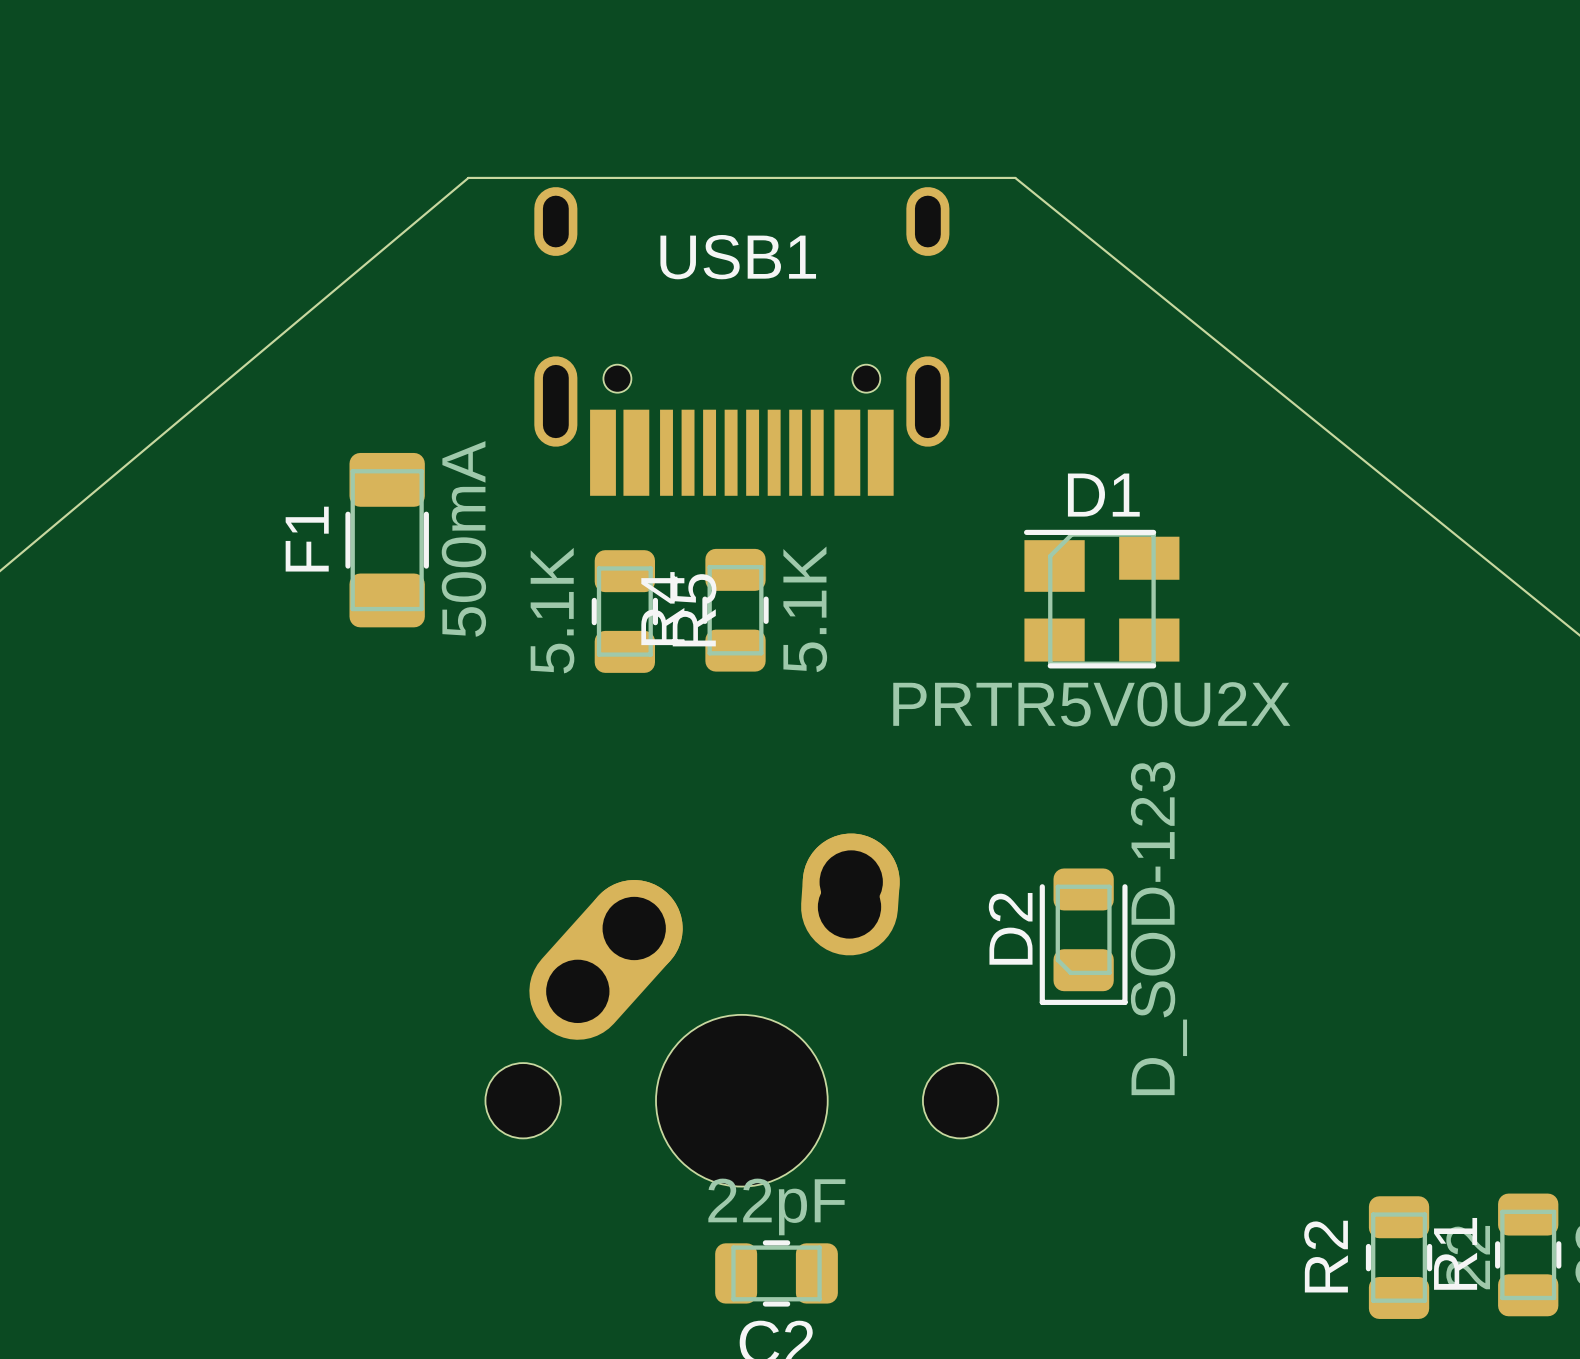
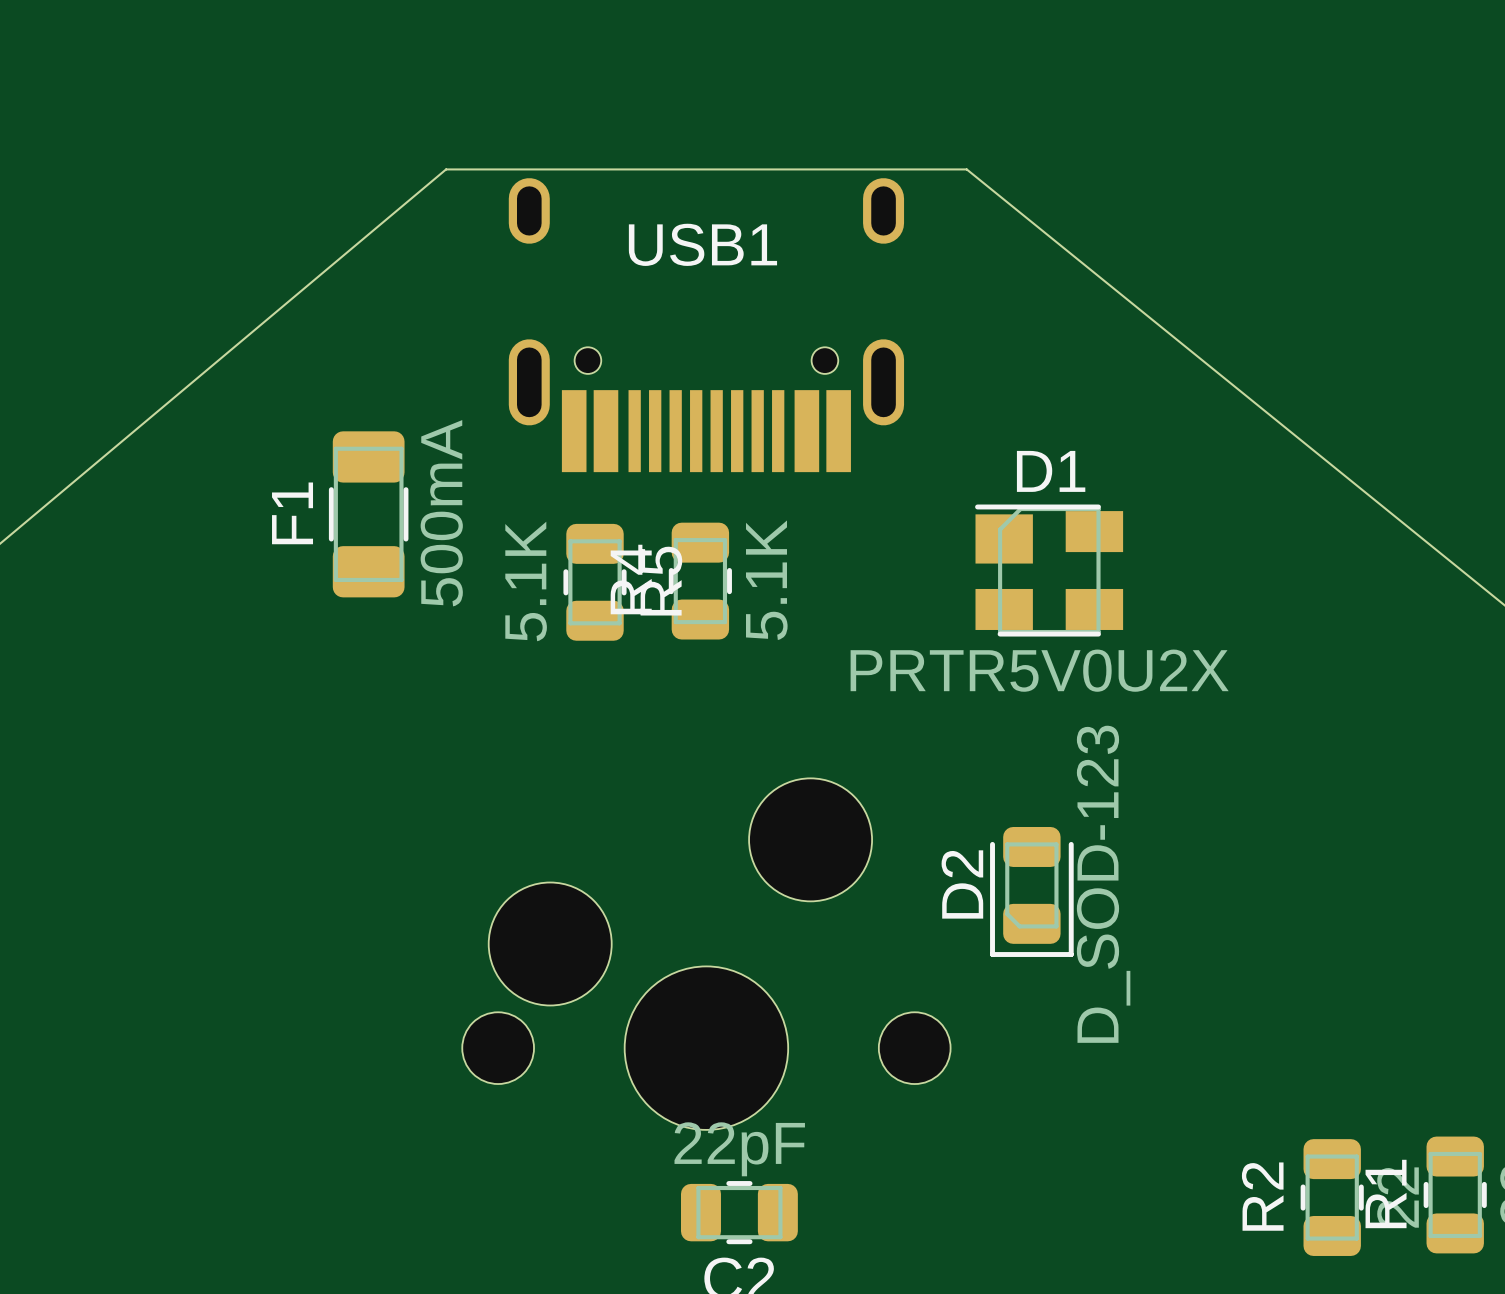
part footprint: [485, 833, 999, 1187] -> [462, 778, 951, 1130]

